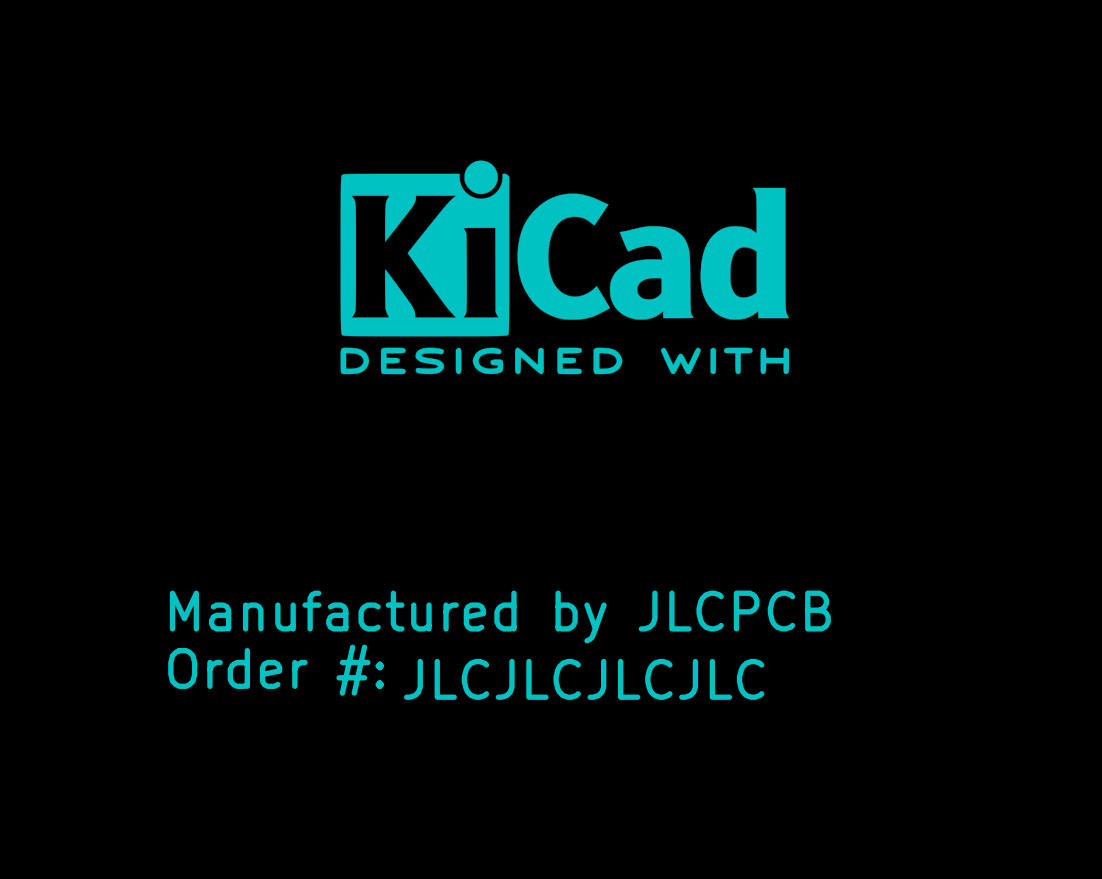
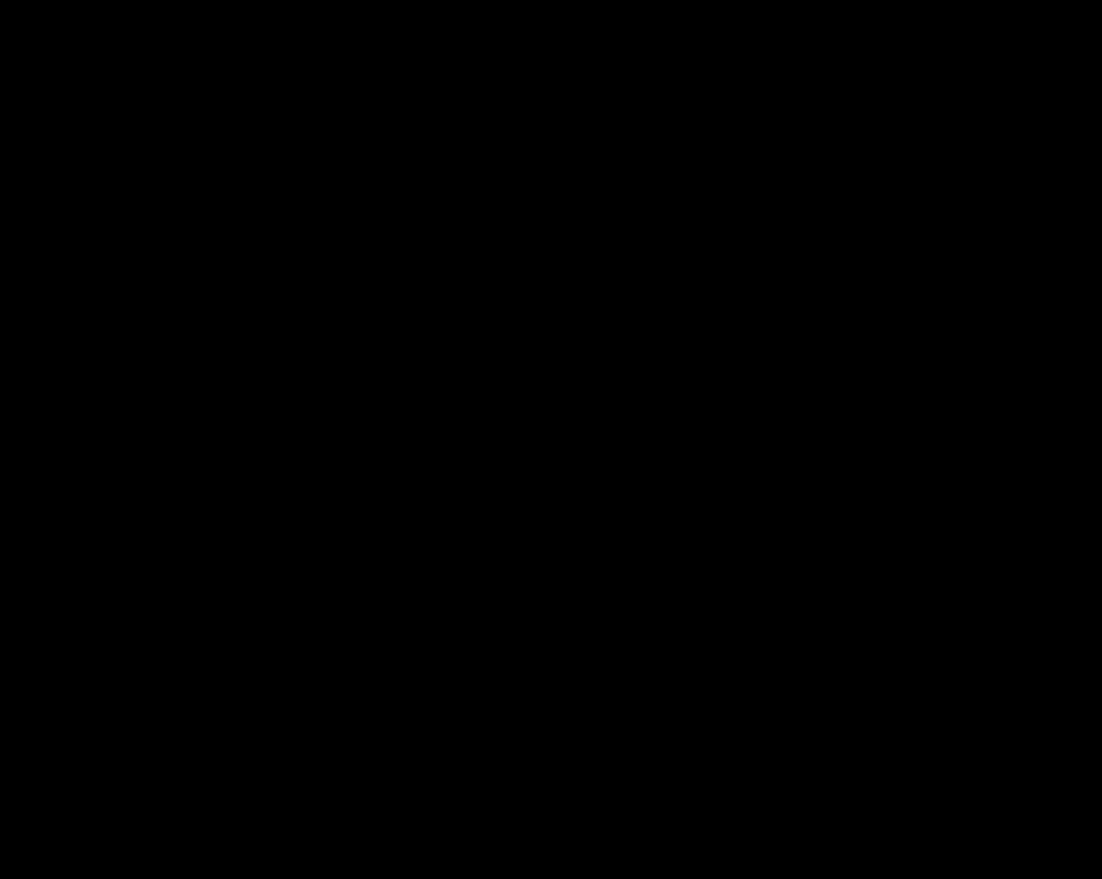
drawing: [340, 160, 790, 375] -> none
text: Manufactured by JLCPCB (500, 616) -> none
text: Order #: (276, 670) -> none
text: JLCJLCJLCJLC (584, 679) -> none

